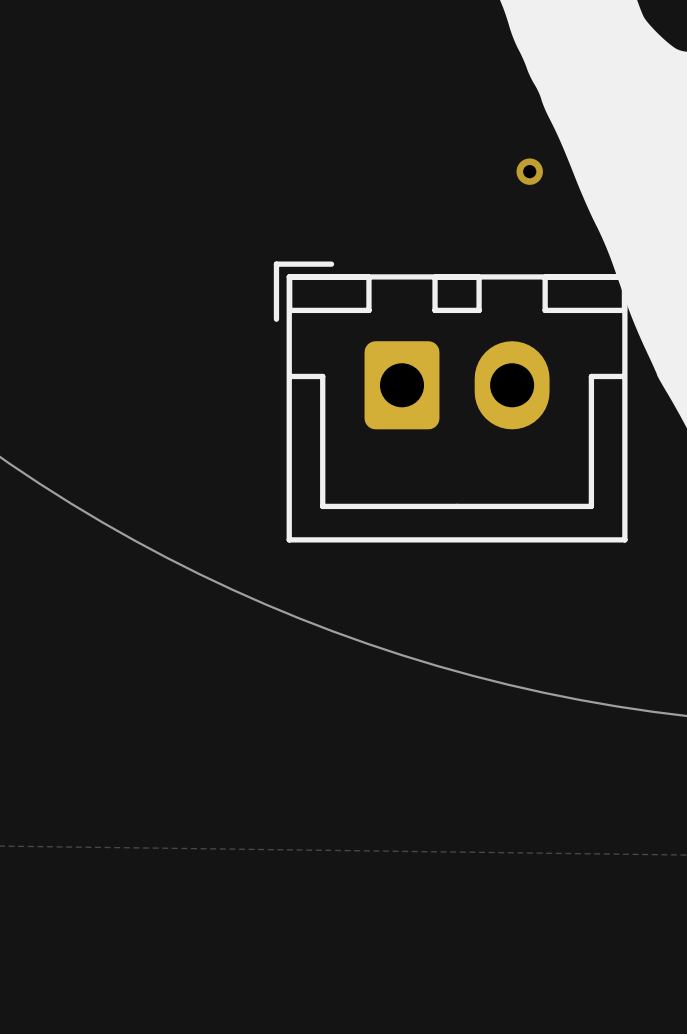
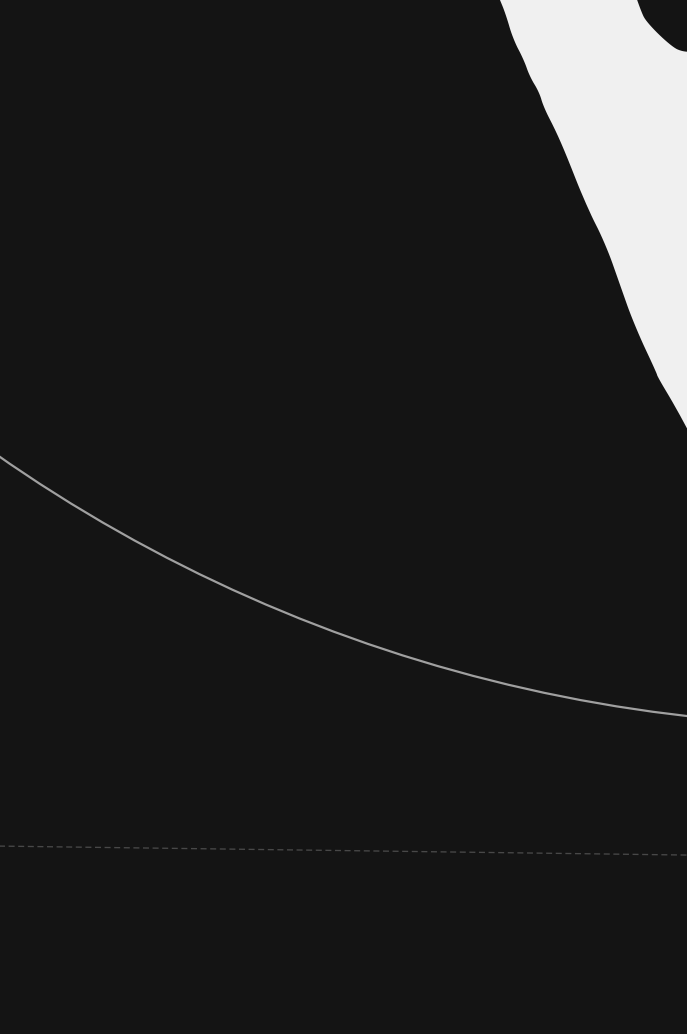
via: (529, 171) -> none
part: (450, 402) -> none

